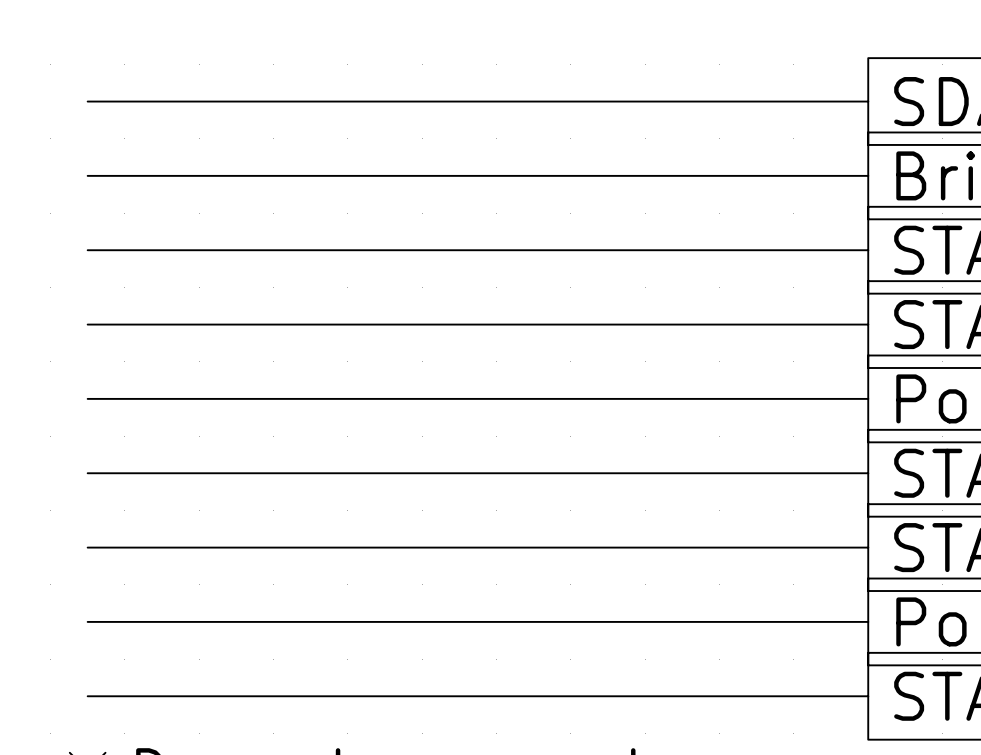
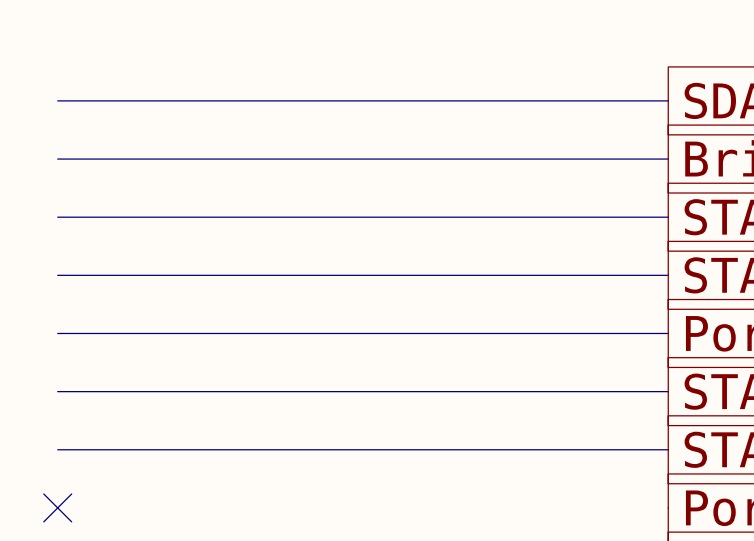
wire: (87, 621) (868, 621) -> none
no-connect mark: none -> (57, 507)

